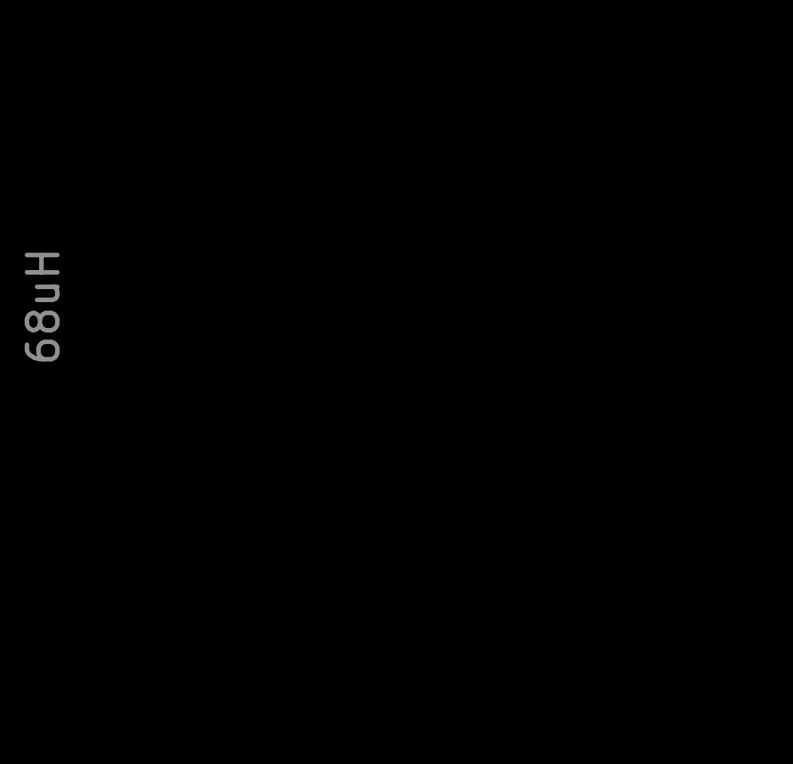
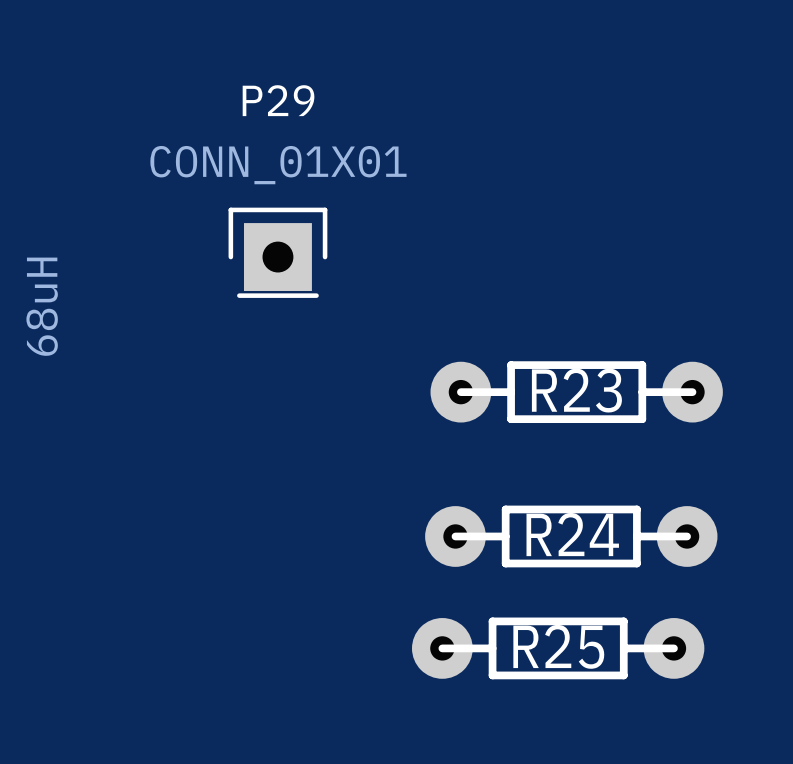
P29: none -> CONN_01X01 (277, 252)
R23: none -> (576, 392)
R24: none -> (571, 536)
R25: none -> (558, 648)

